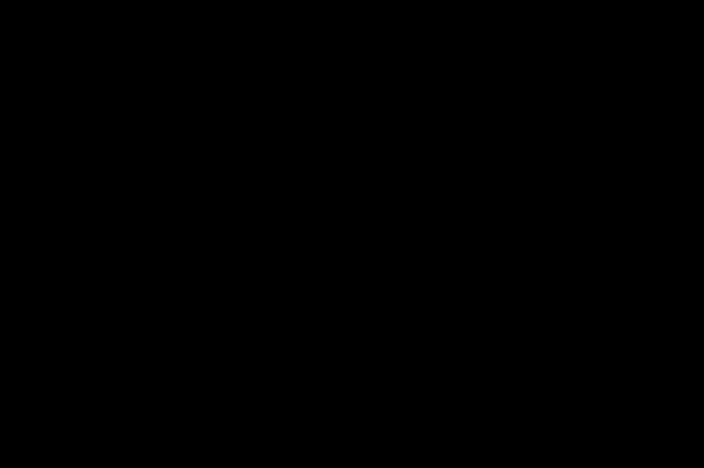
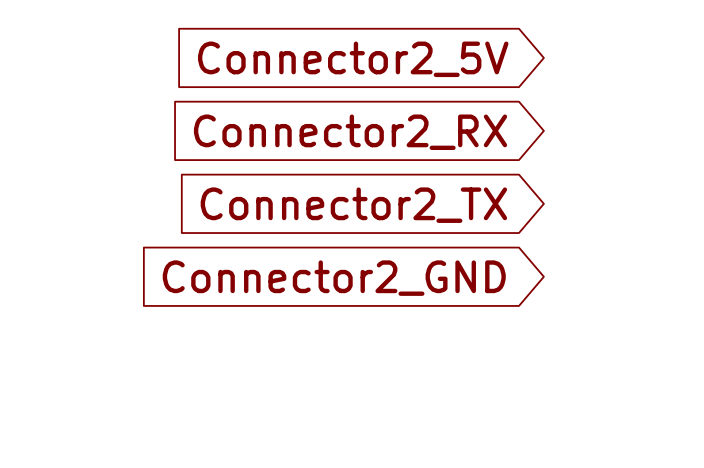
global label: none -> Connector2_5V (353, 59)
global label: none -> Connector2_RX (350, 132)
global label: none -> Connector2_TX (353, 205)
global label: none -> Connector2_GND (334, 278)

